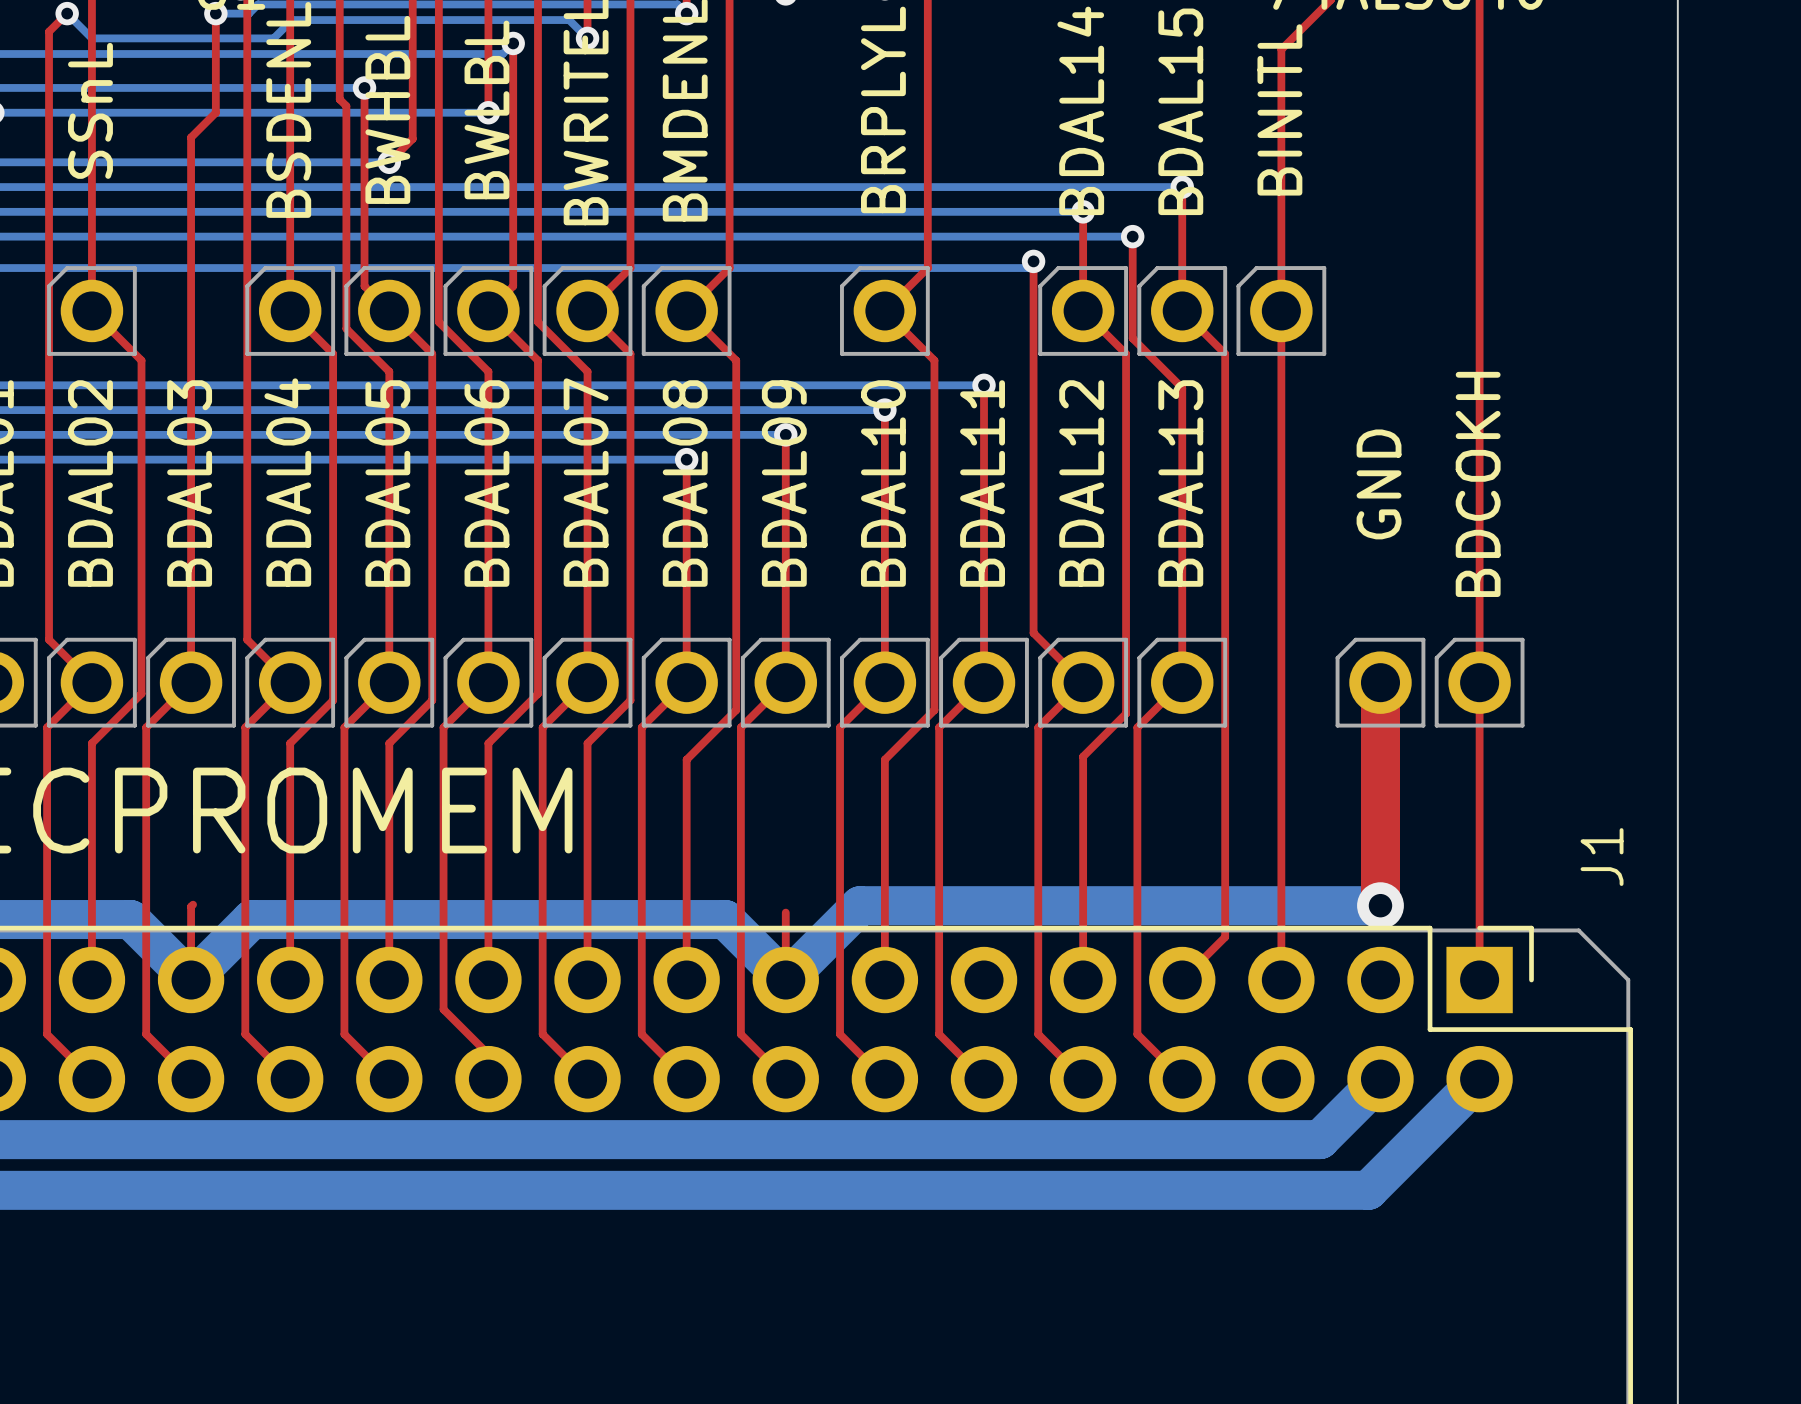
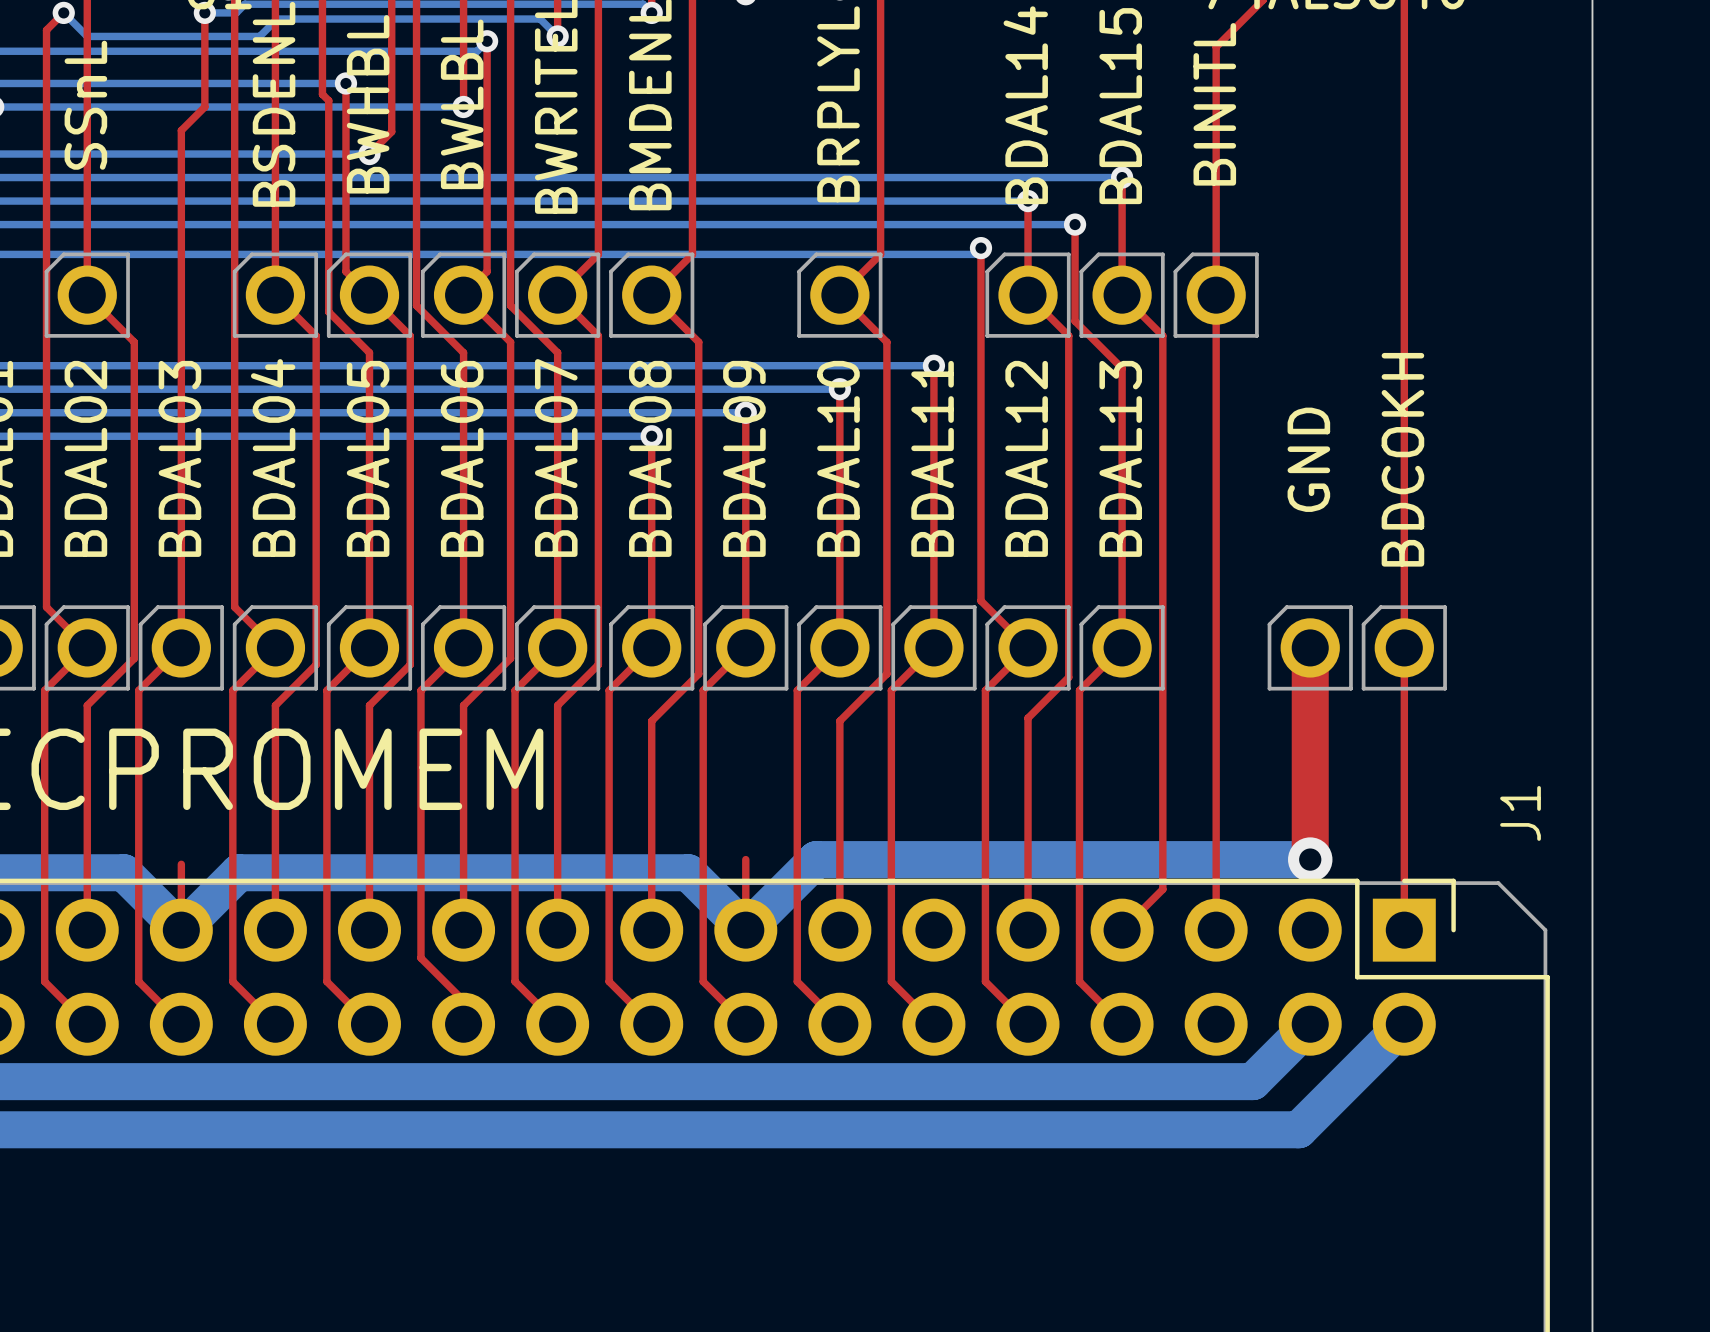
top track: (193, 904) (191, 910) -> none
top track: none -> (745, 859) (745, 866)

